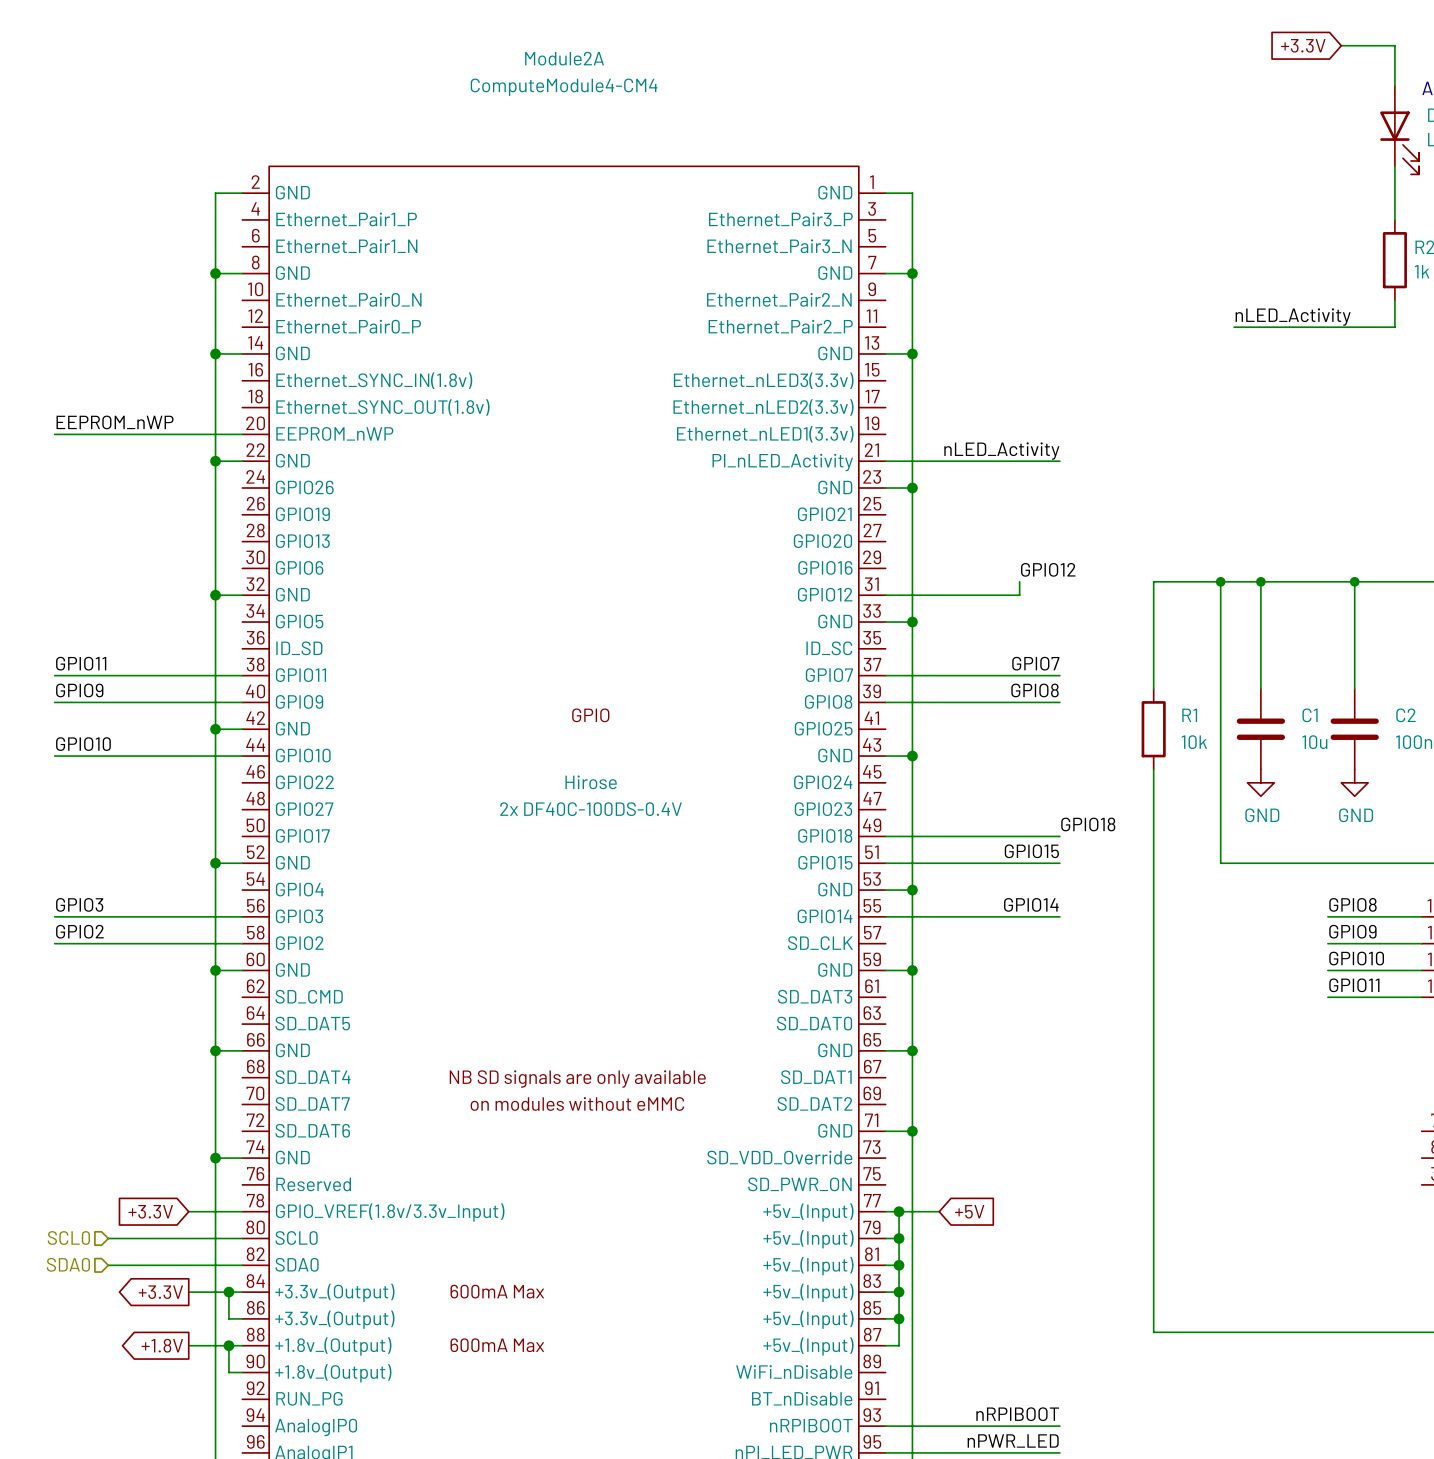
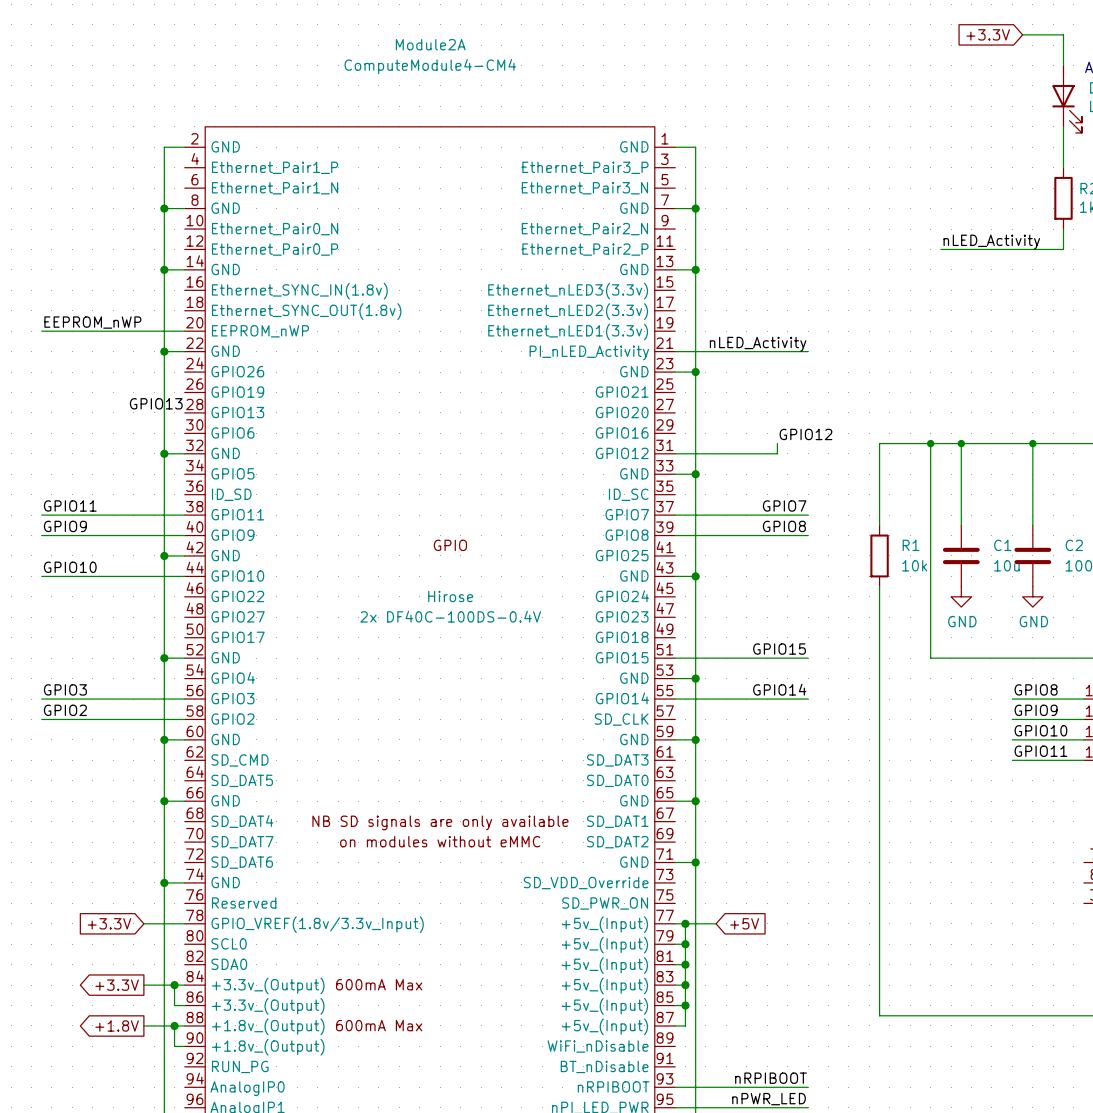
label: none -> GPIO13 (156, 403)
label: GPIO18 (1088, 824) -> none
wire: (885, 836) (1059, 836) -> none
hierarchical label: SCL0 (68, 1238) -> none
wire: (108, 1238) (242, 1238) -> none
hierarchical label: SDA0 (68, 1264) -> none
wire: (108, 1265) (242, 1265) -> none

